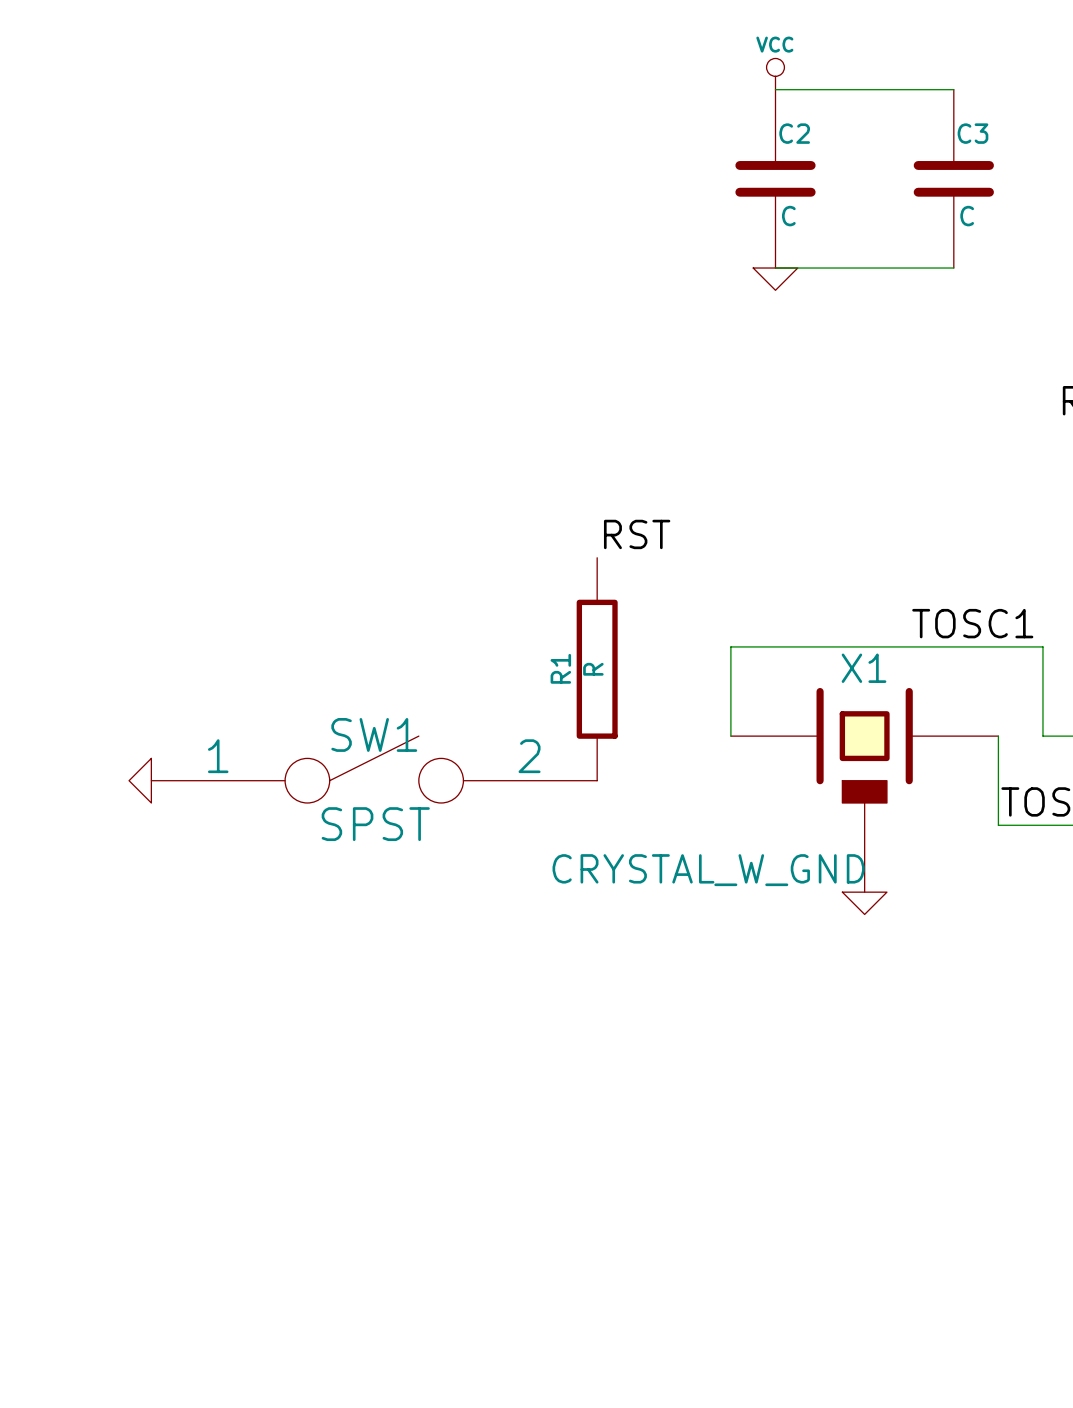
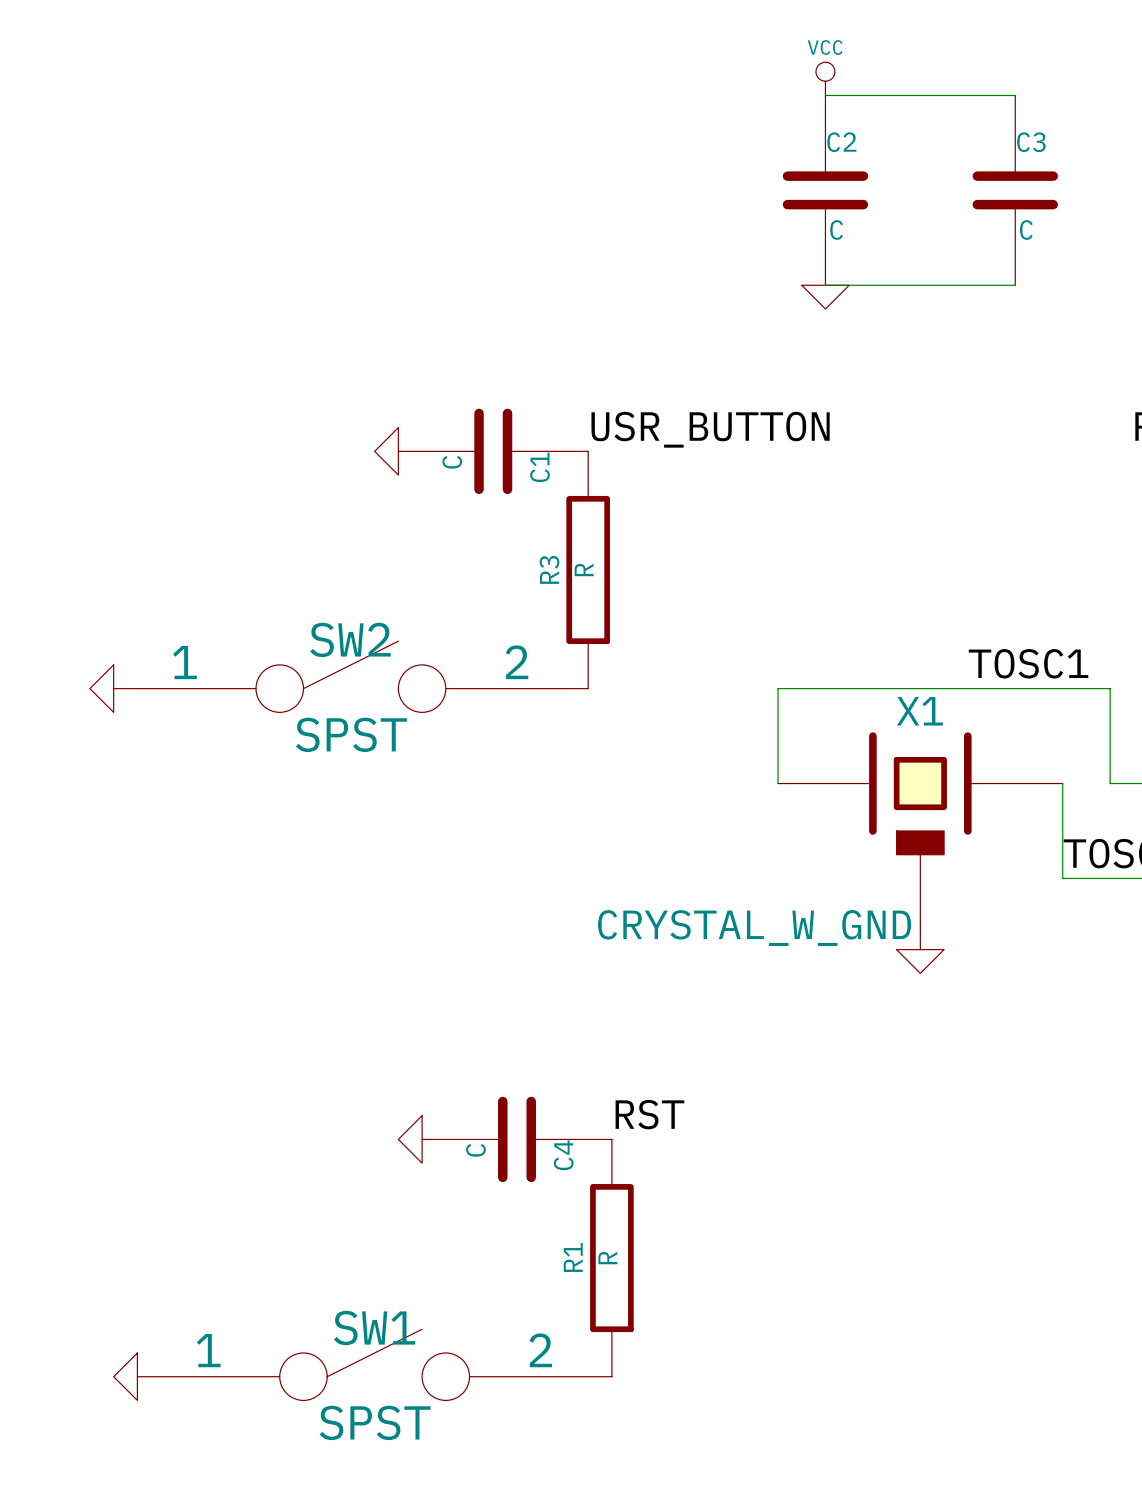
label: none -> USR_BUTTON (710, 429)
power symbol: none -> (386, 451)
C1: none -> C (493, 451)
label: RST (637, 534) -> none
R3: none -> R (588, 570)
SW2: none -> SPST (350, 676)
R1 position: (597, 669) -> (611, 1258)
SW1 position: (374, 769) -> (374, 1364)
power symbol position: (140, 780) -> (101, 688)
label: none -> RST (649, 1114)
power symbol: none -> (410, 1139)
C4: none -> C (517, 1139)
power symbol: none -> (125, 1376)

